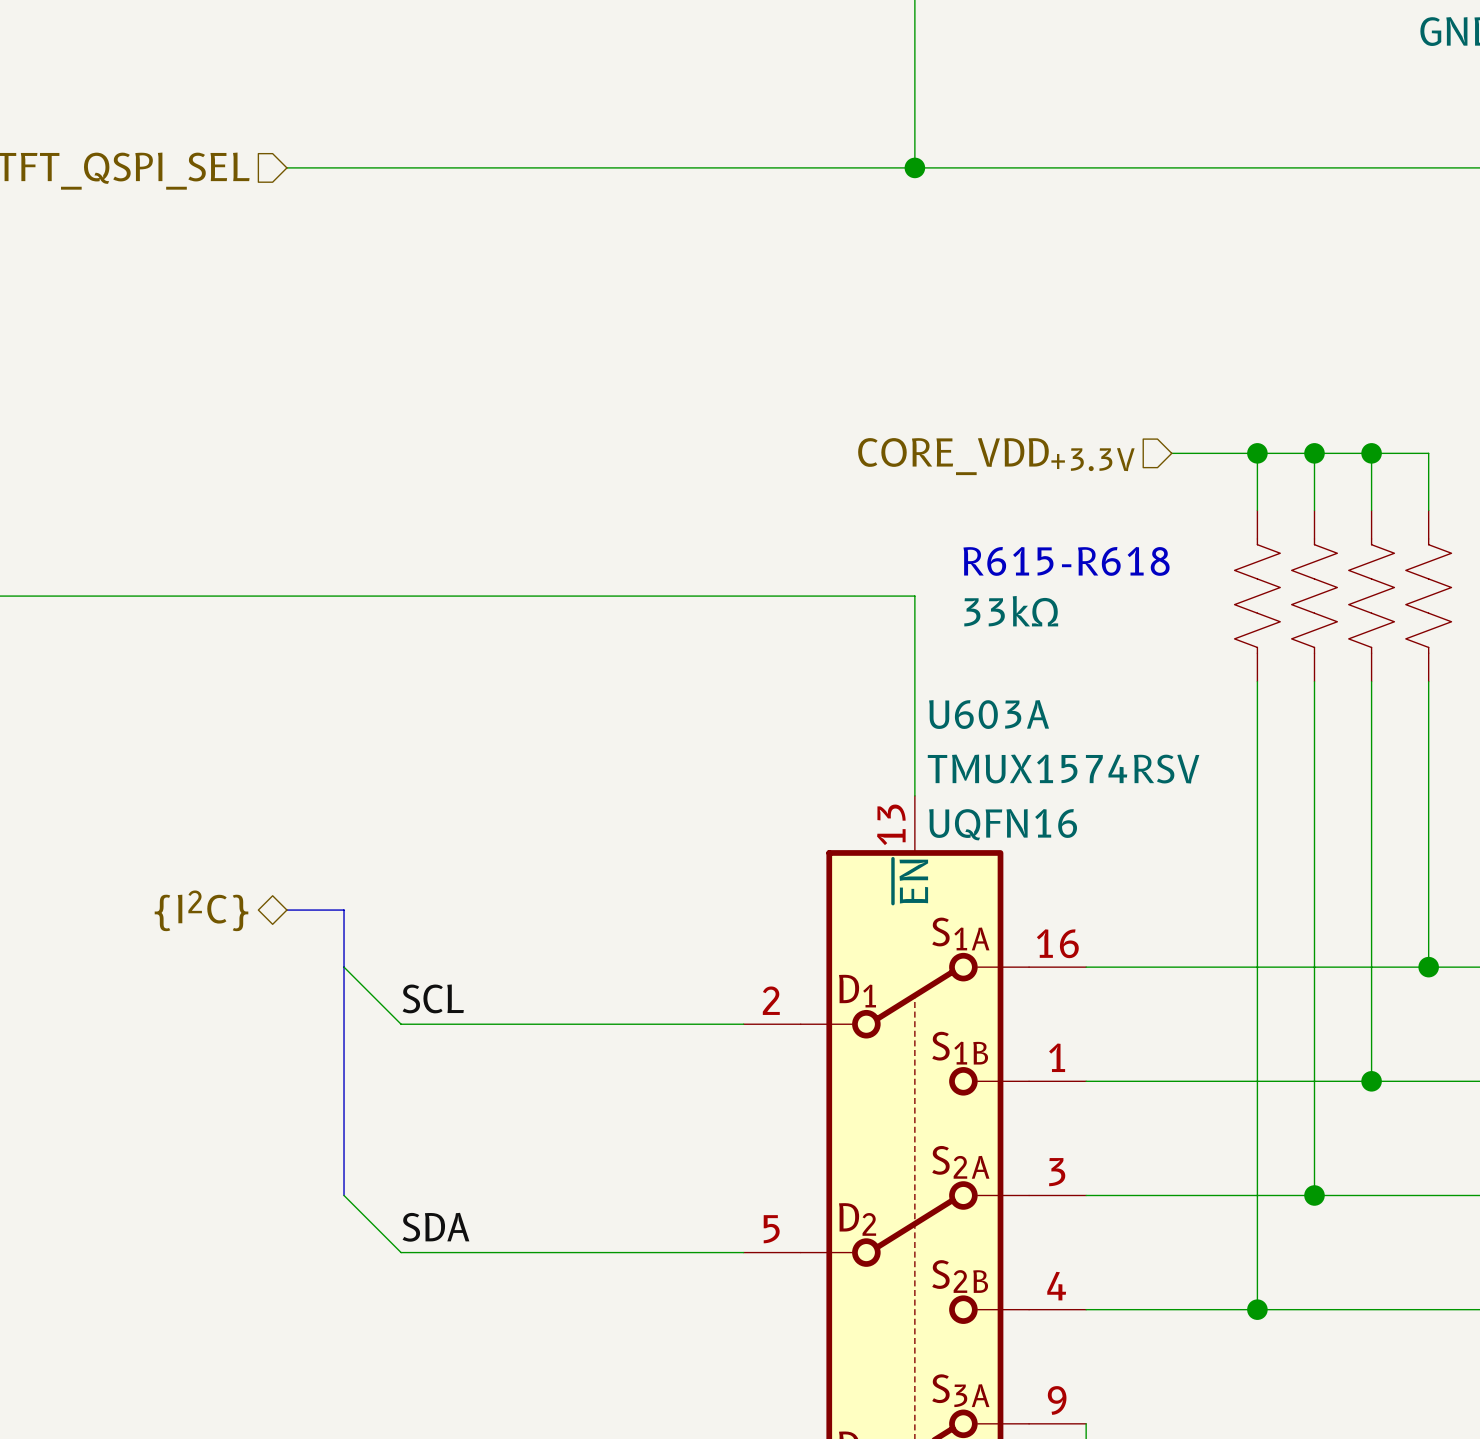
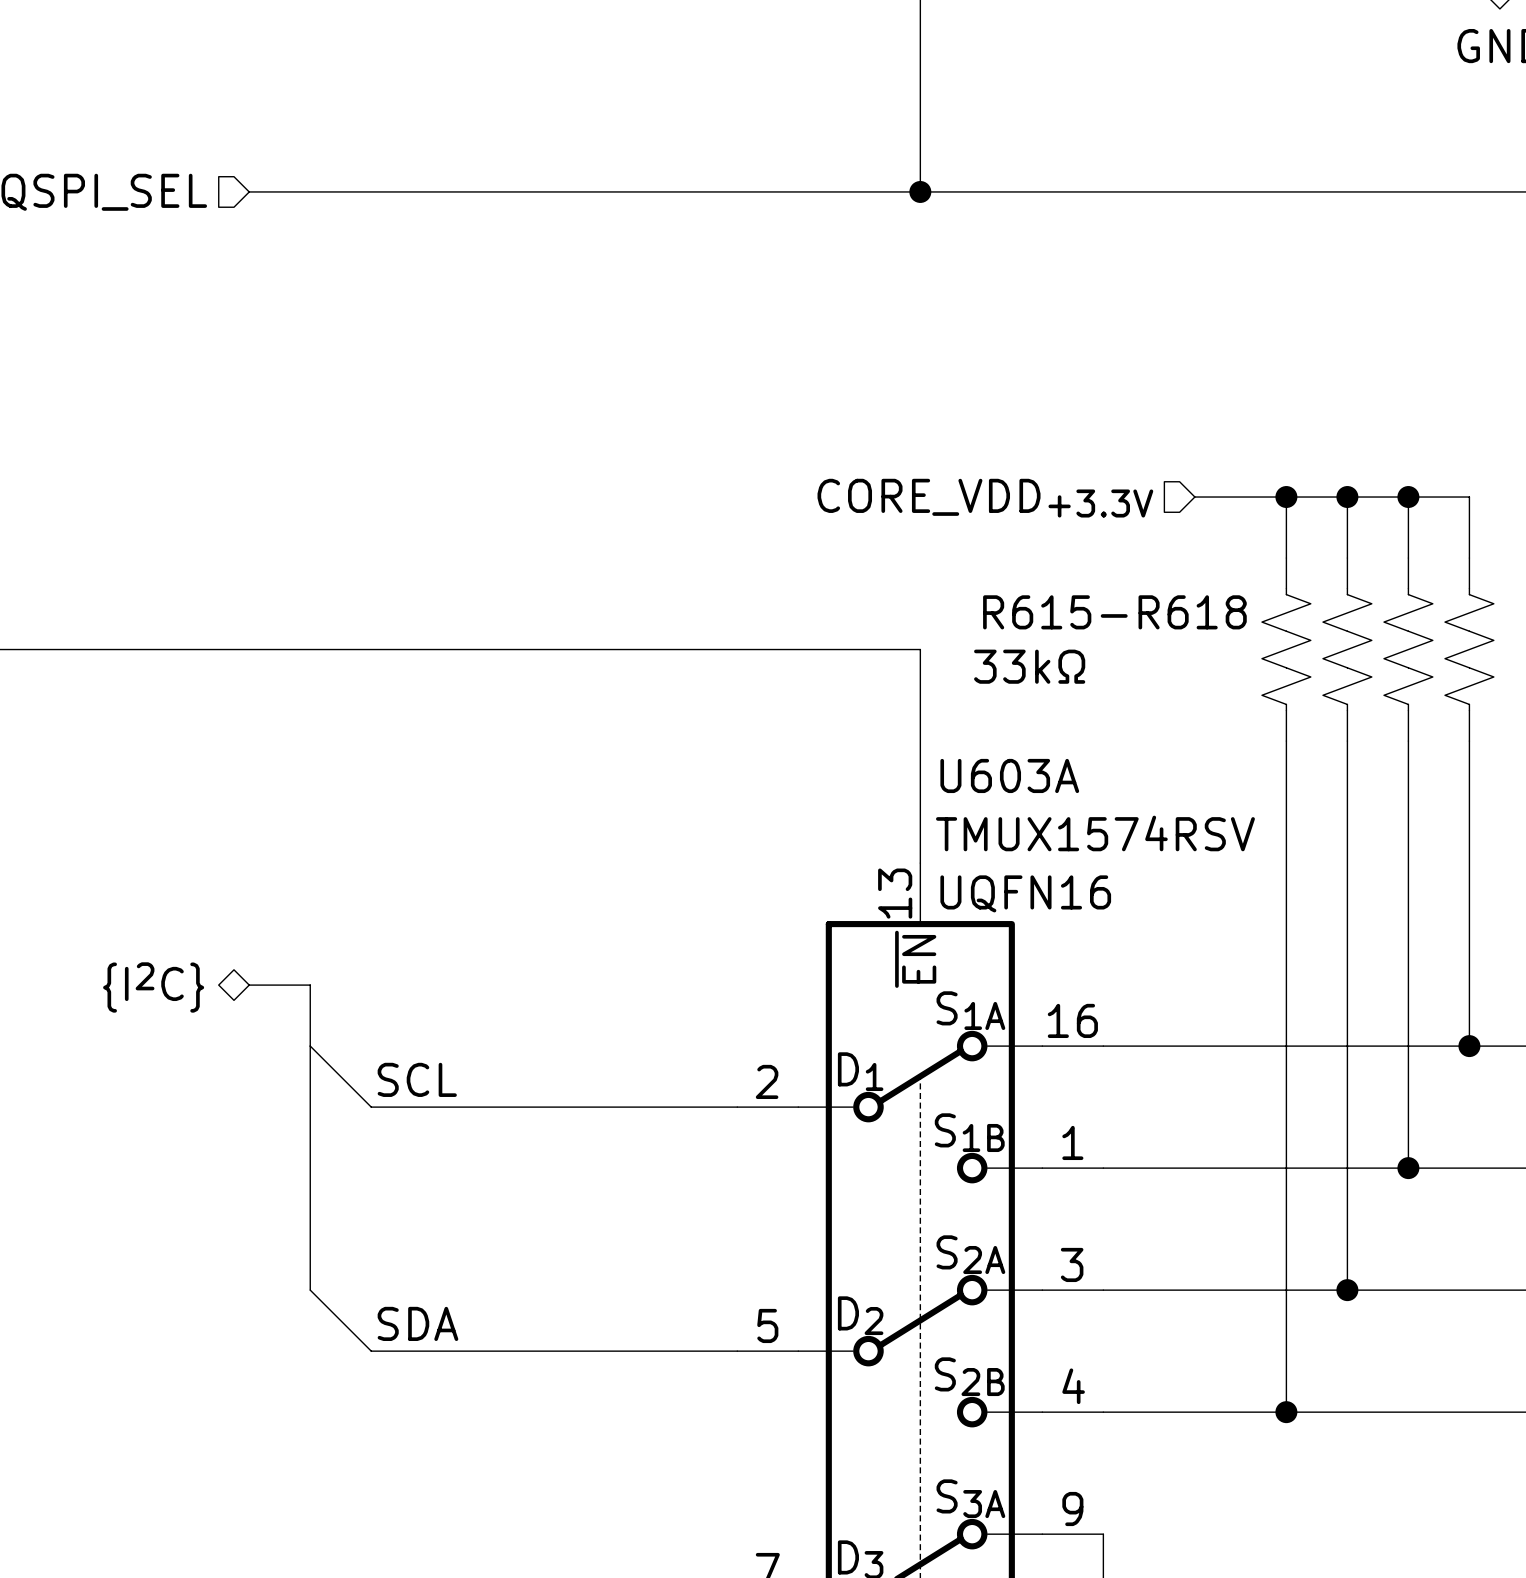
text position: R615-R618 (1066, 561) -> R615-R618 (1114, 612)

